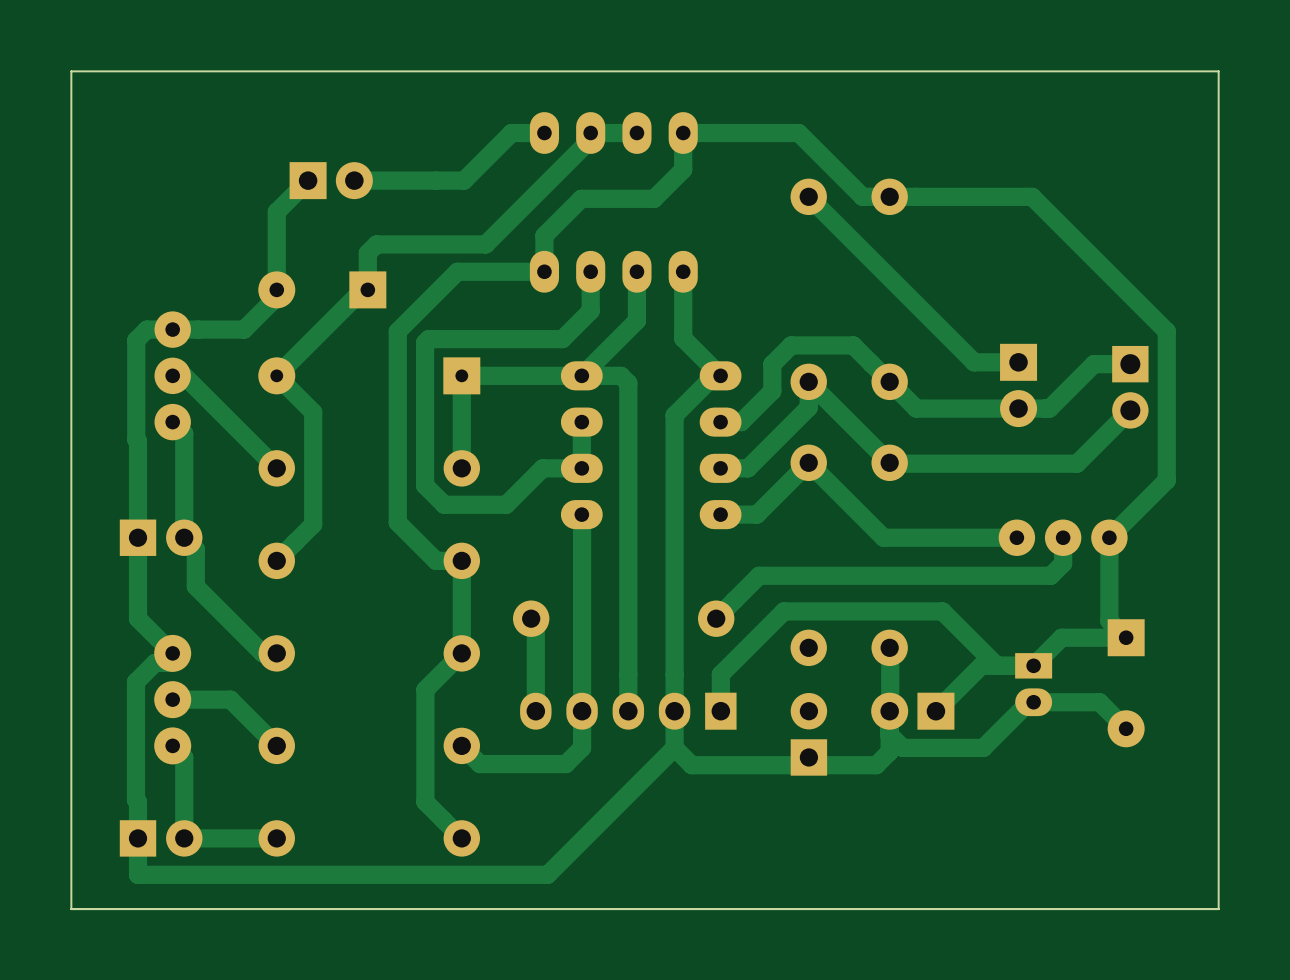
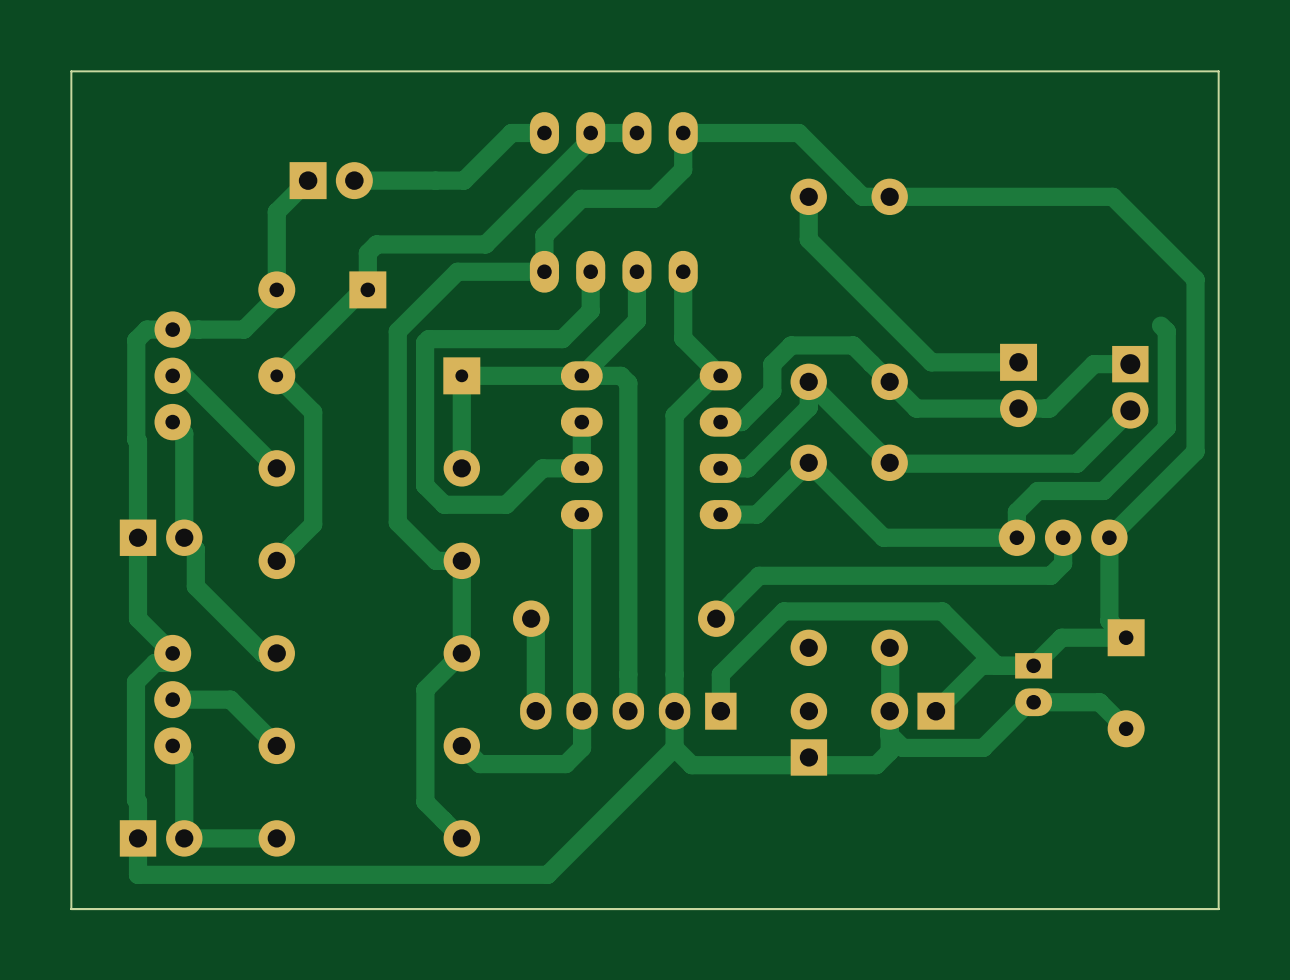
track: (808, 196) (974, 362) -> (808, 196) (808, 239) (931, 362) (974, 362)
track: (1032, 196) (1161, 325) -> (1032, 196) (1112, 196) (1195, 279) (1195, 451) (1166, 480)
track: (1166, 427) (1166, 480) -> (1166, 427) (1103, 491) (1037, 491) (1016, 511) (1016, 537)

